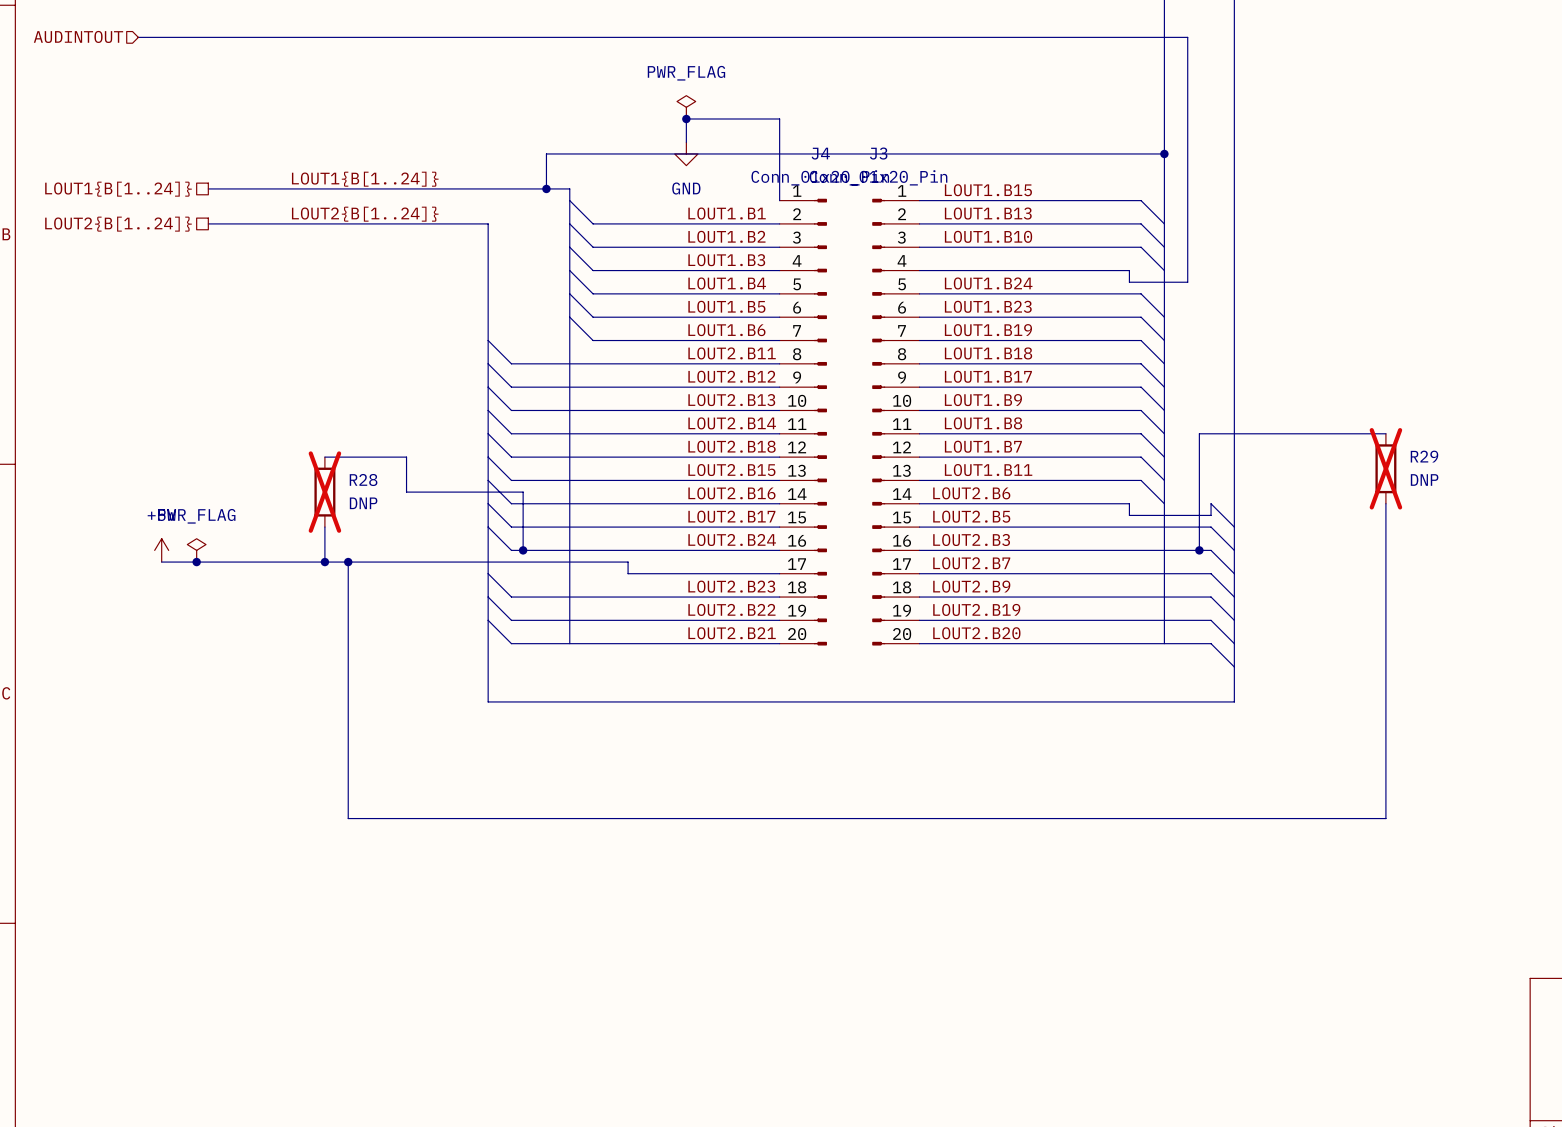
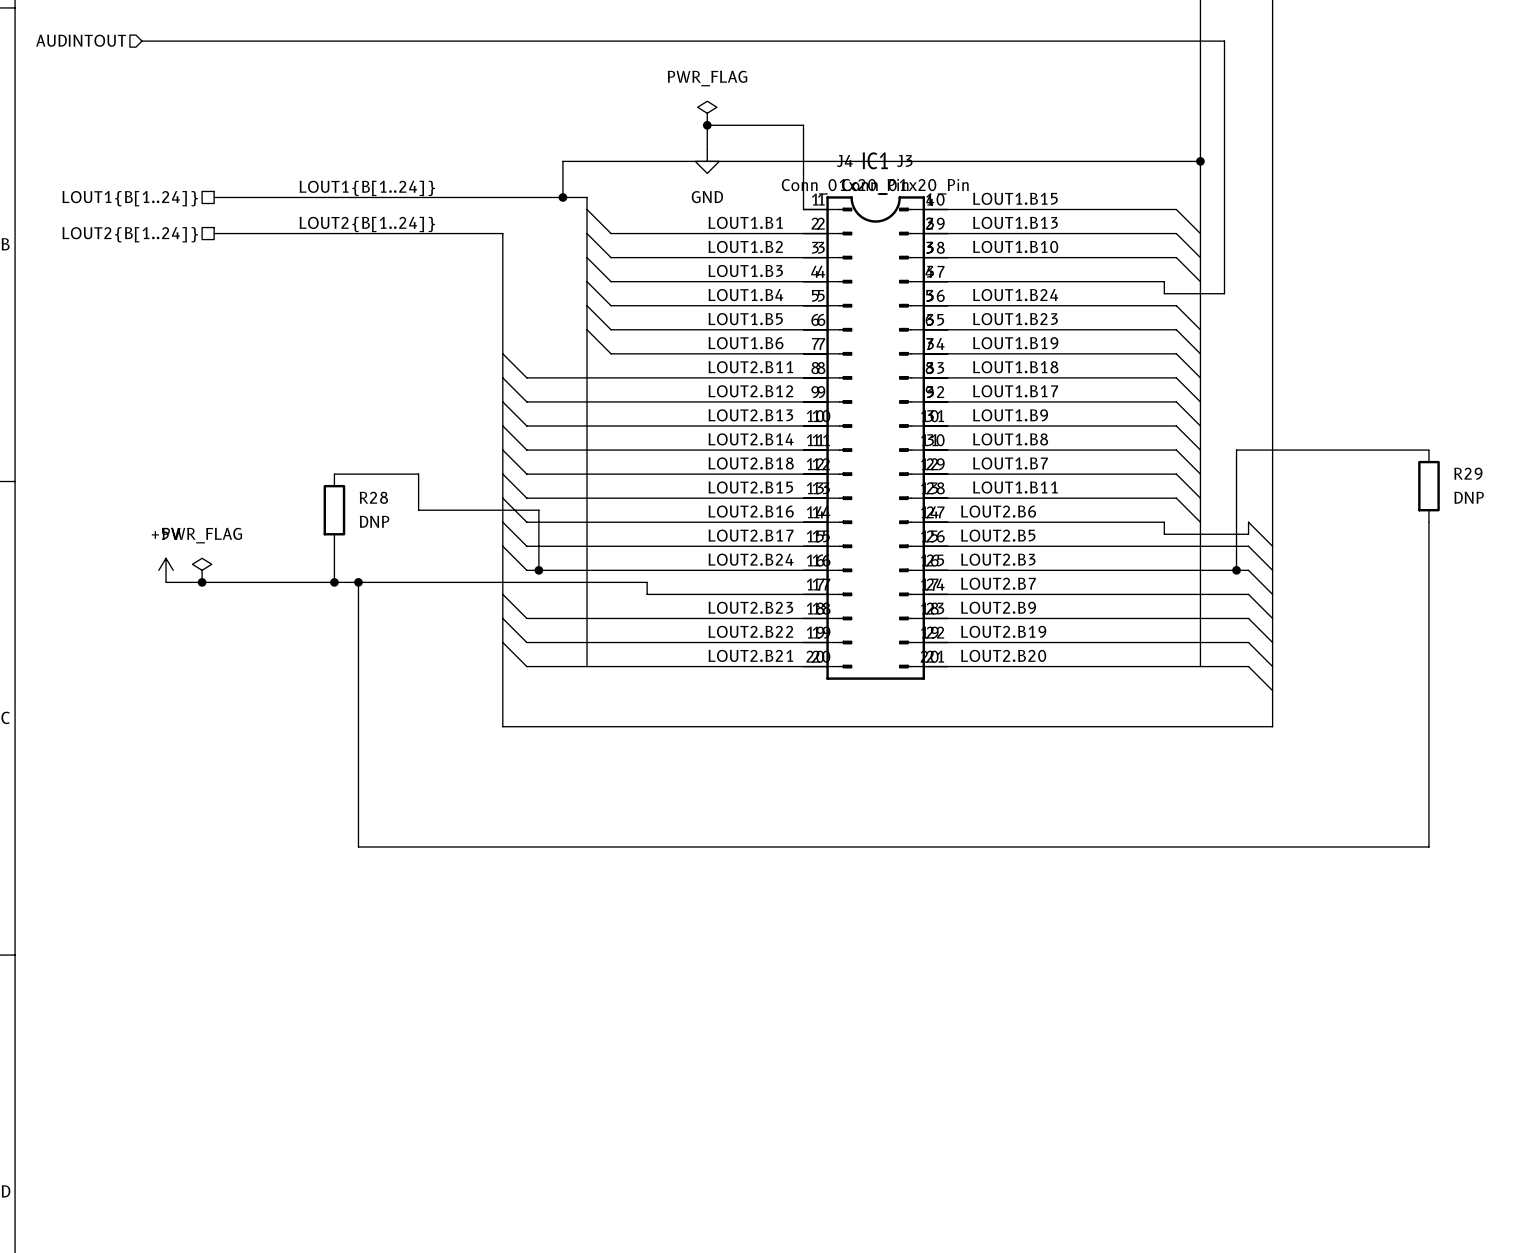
IC1: none -> (875, 438)
R29 do-not-place cross: (1385, 468) -> none
R28 do-not-place cross: (324, 492) -> none

